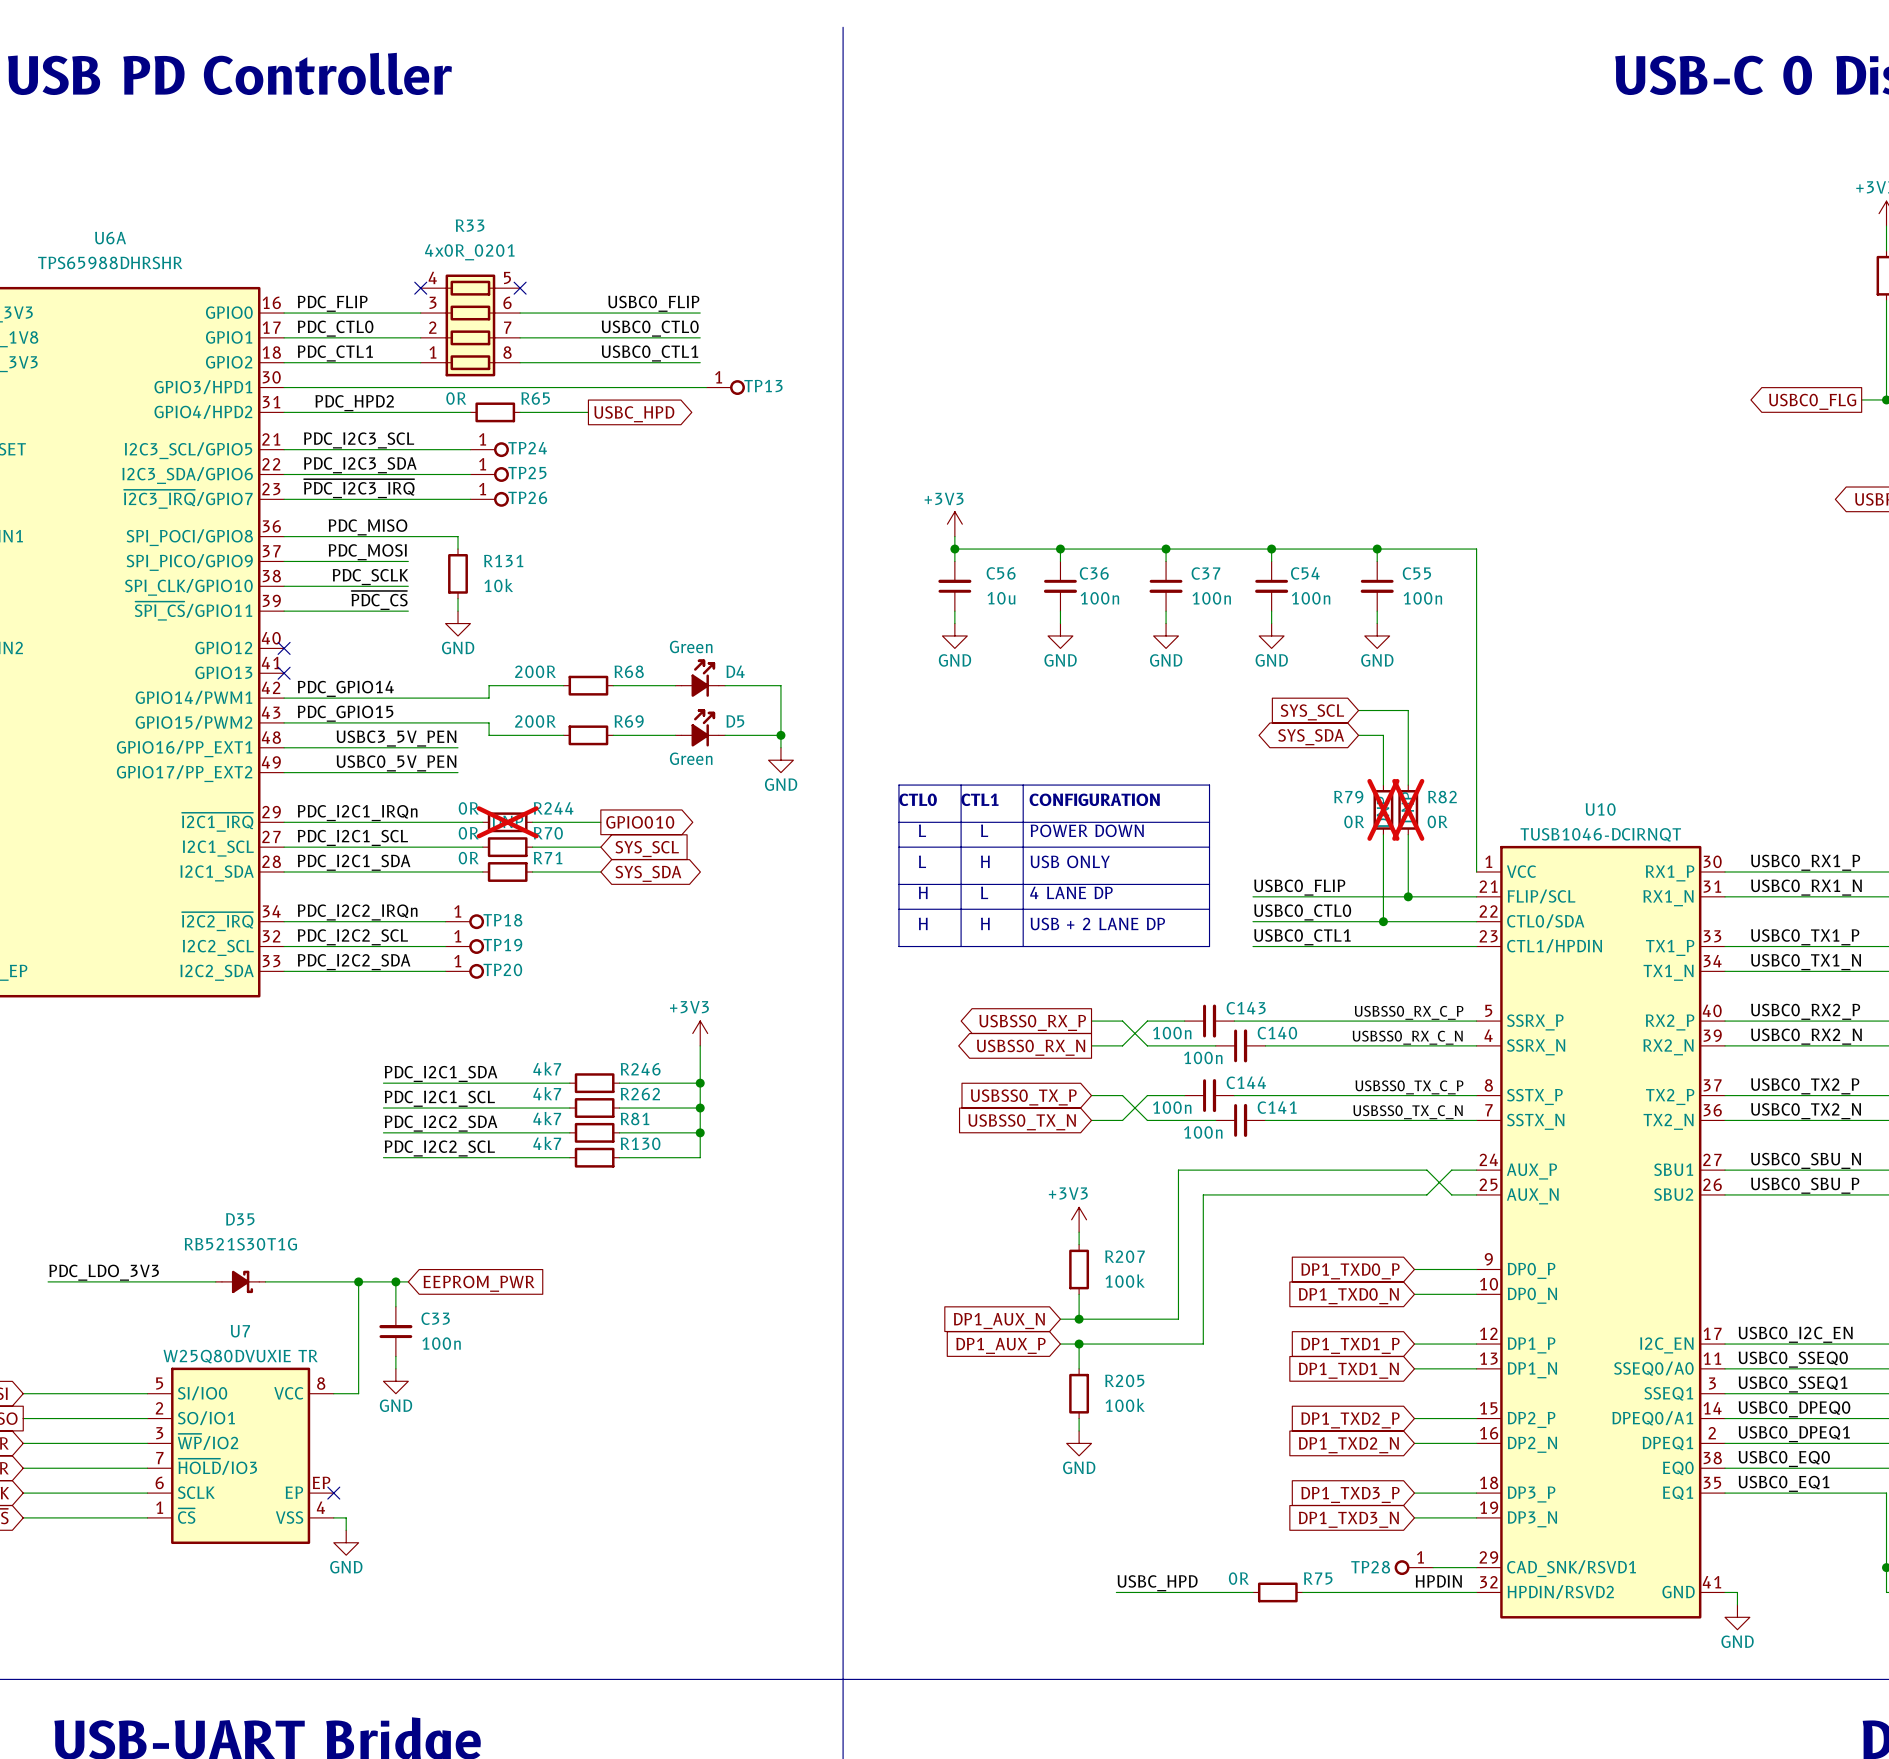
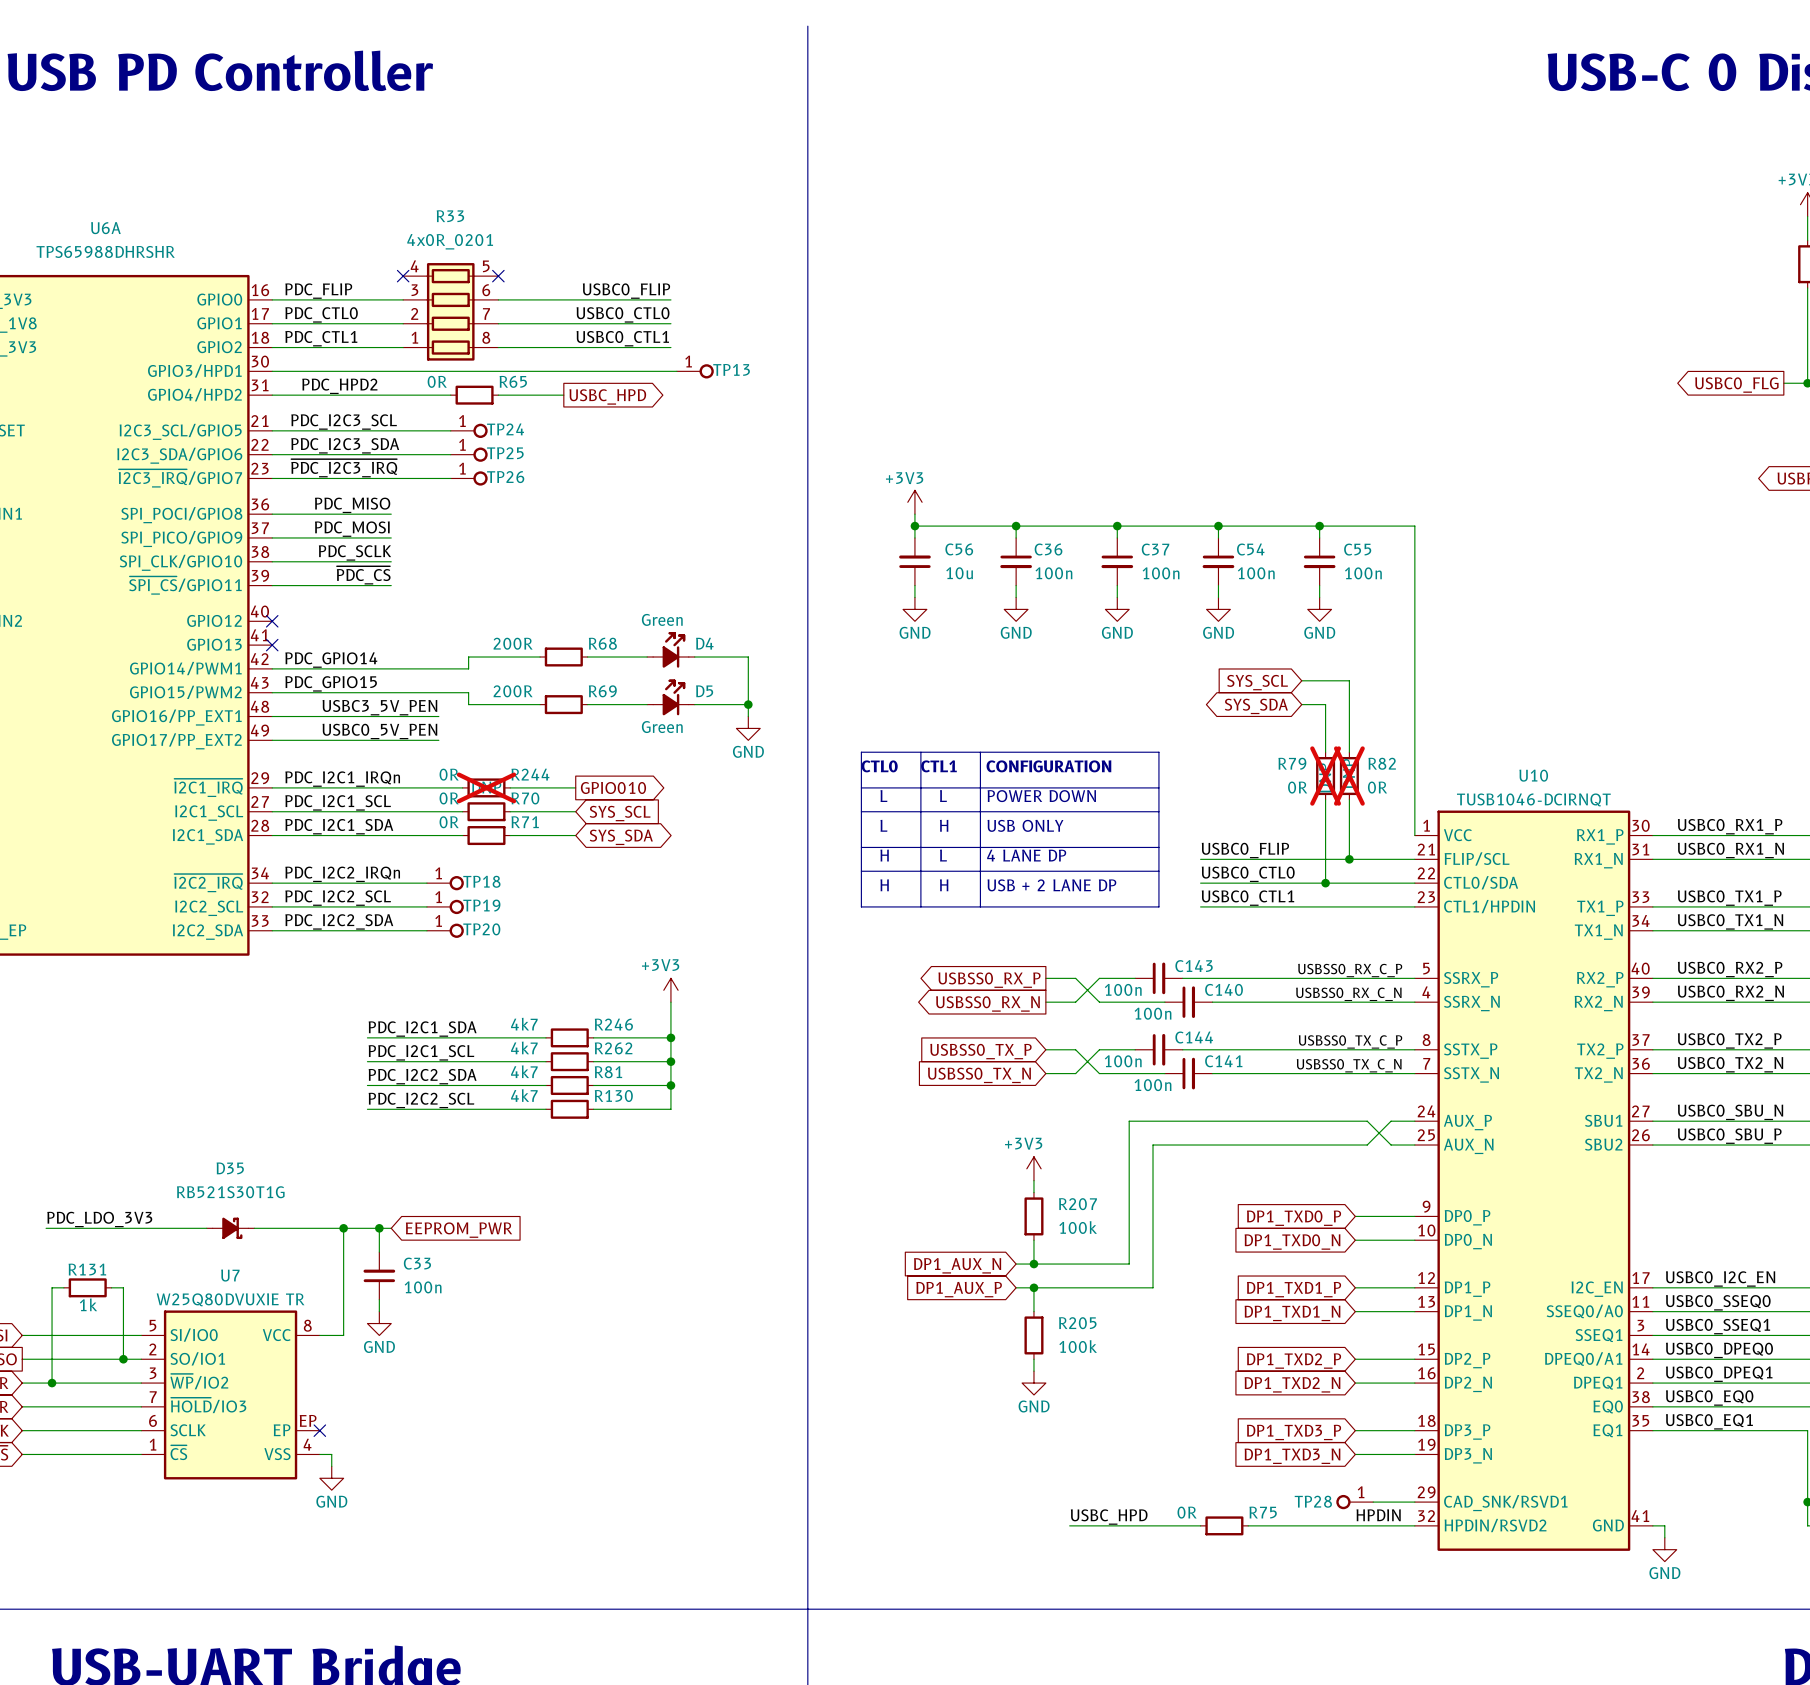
wire: (408, 536) (458, 536) (458, 549) -> none
R131 name position: R131 (503, 560) -> R131 (87, 1269)
R131 rotation: 0° (458, 573) -> 90° clockwise (87, 1287)
R131 position: (458, 573) -> (87, 1287)
R131 text: 10k (498, 585) -> 1k (88, 1304)
wire: (458, 598) (458, 611) -> none
power symbol: GND (458, 623) -> none
wire: none -> (63, 1287) (52, 1287) (52, 1383)
wire: none -> (111, 1287) (123, 1287) (123, 1359)
junction: none -> (123, 1359)
junction: none -> (52, 1383)

